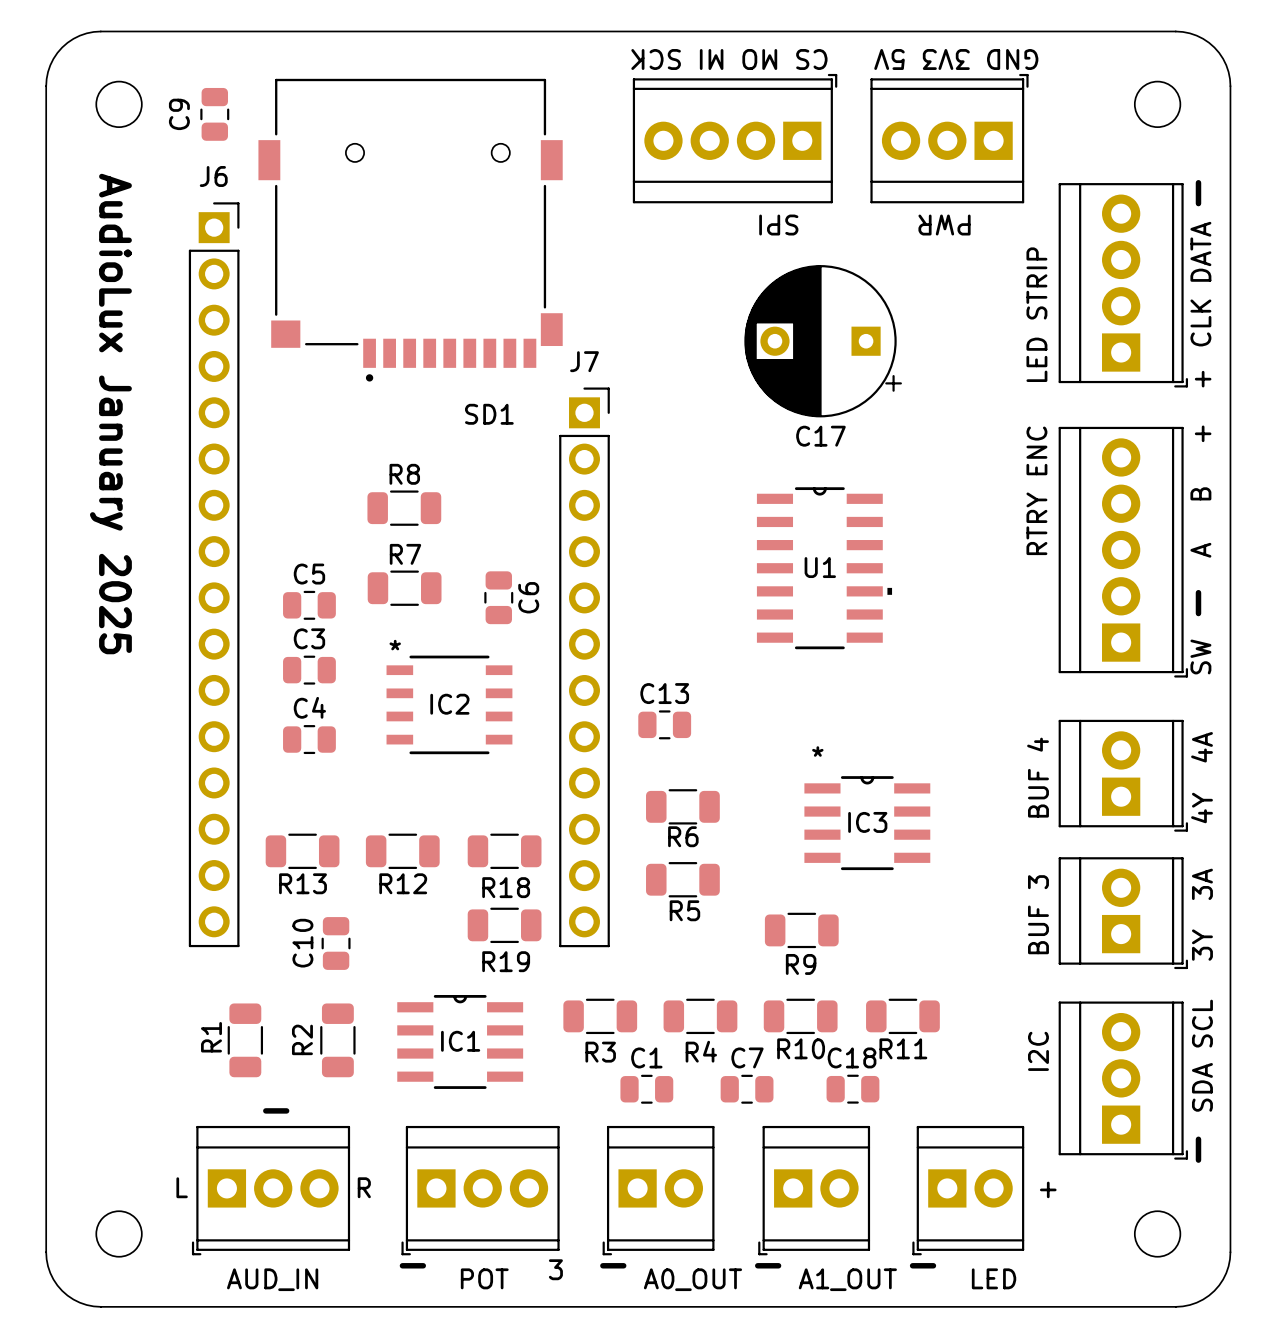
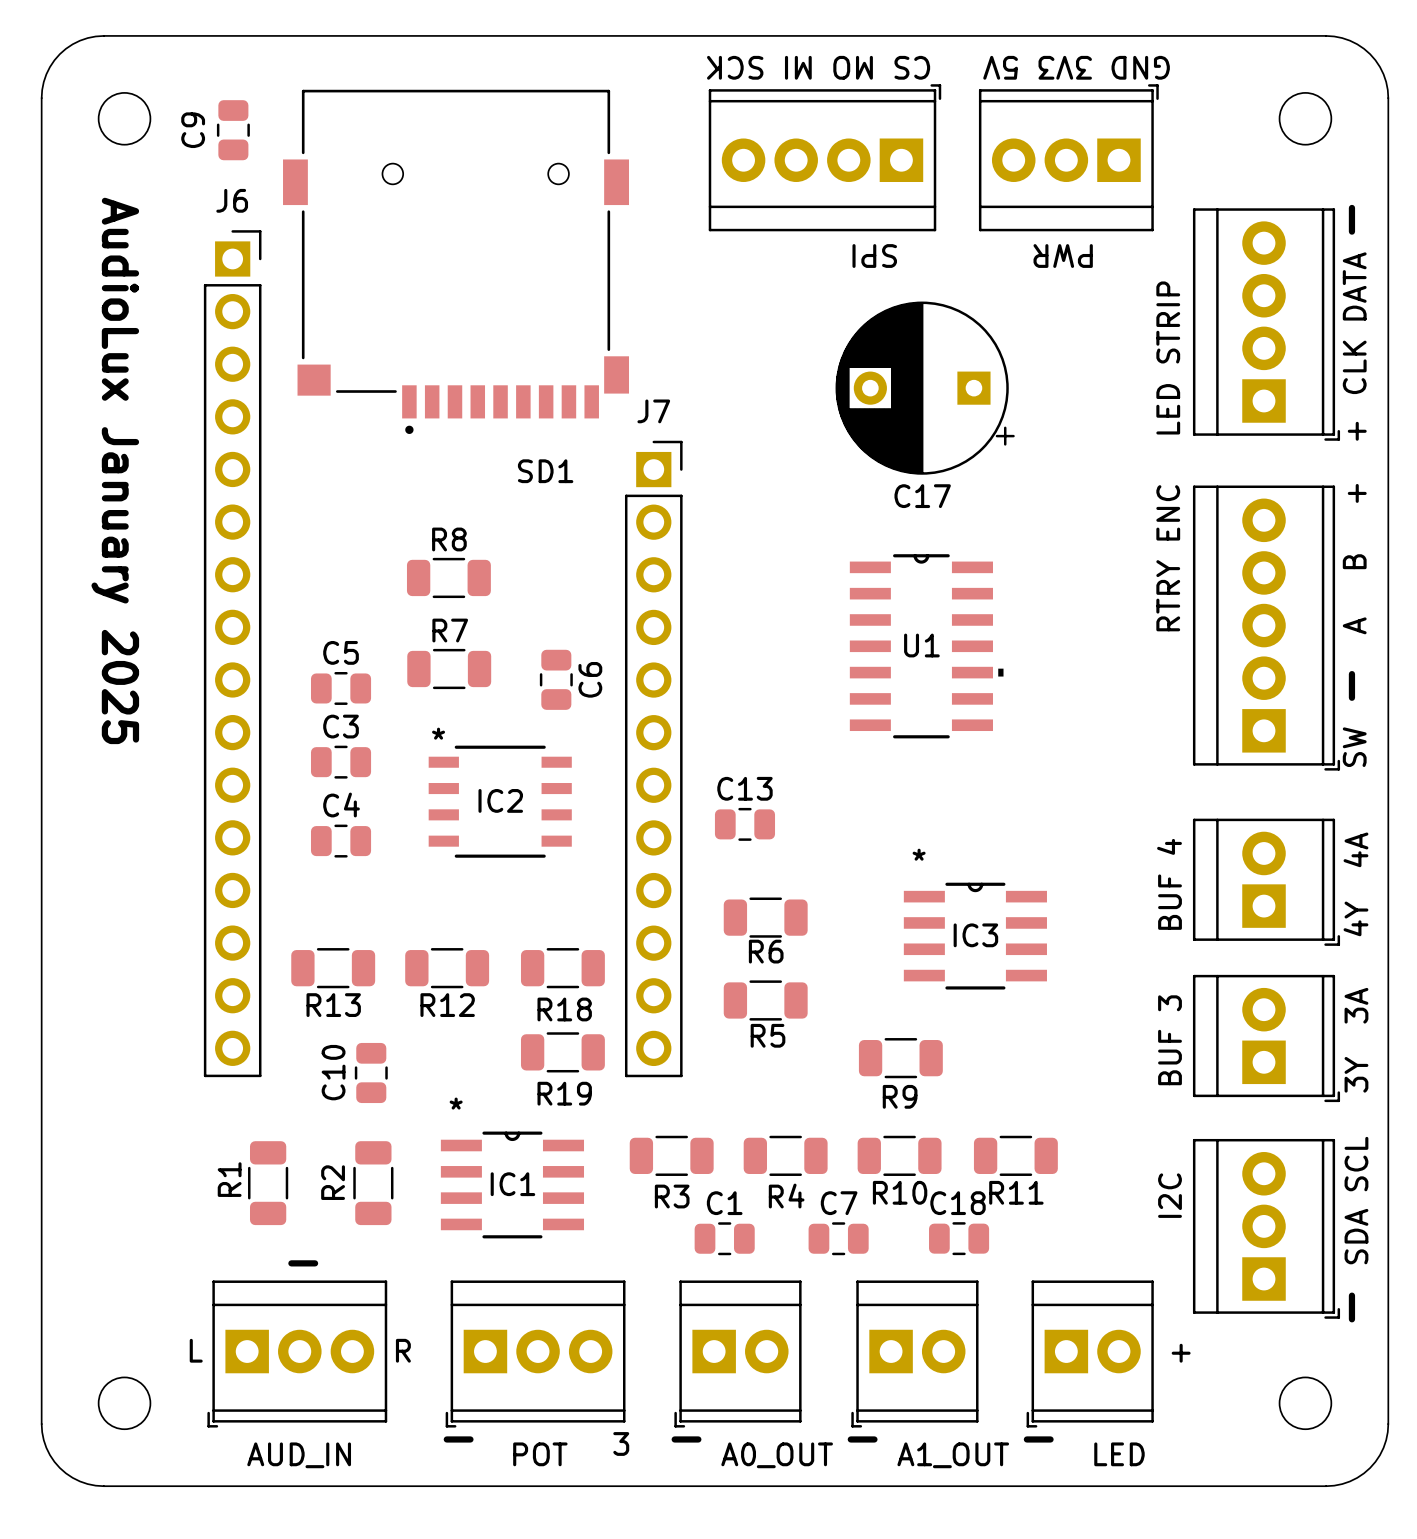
IC1 text: none -> * (456, 1103)

